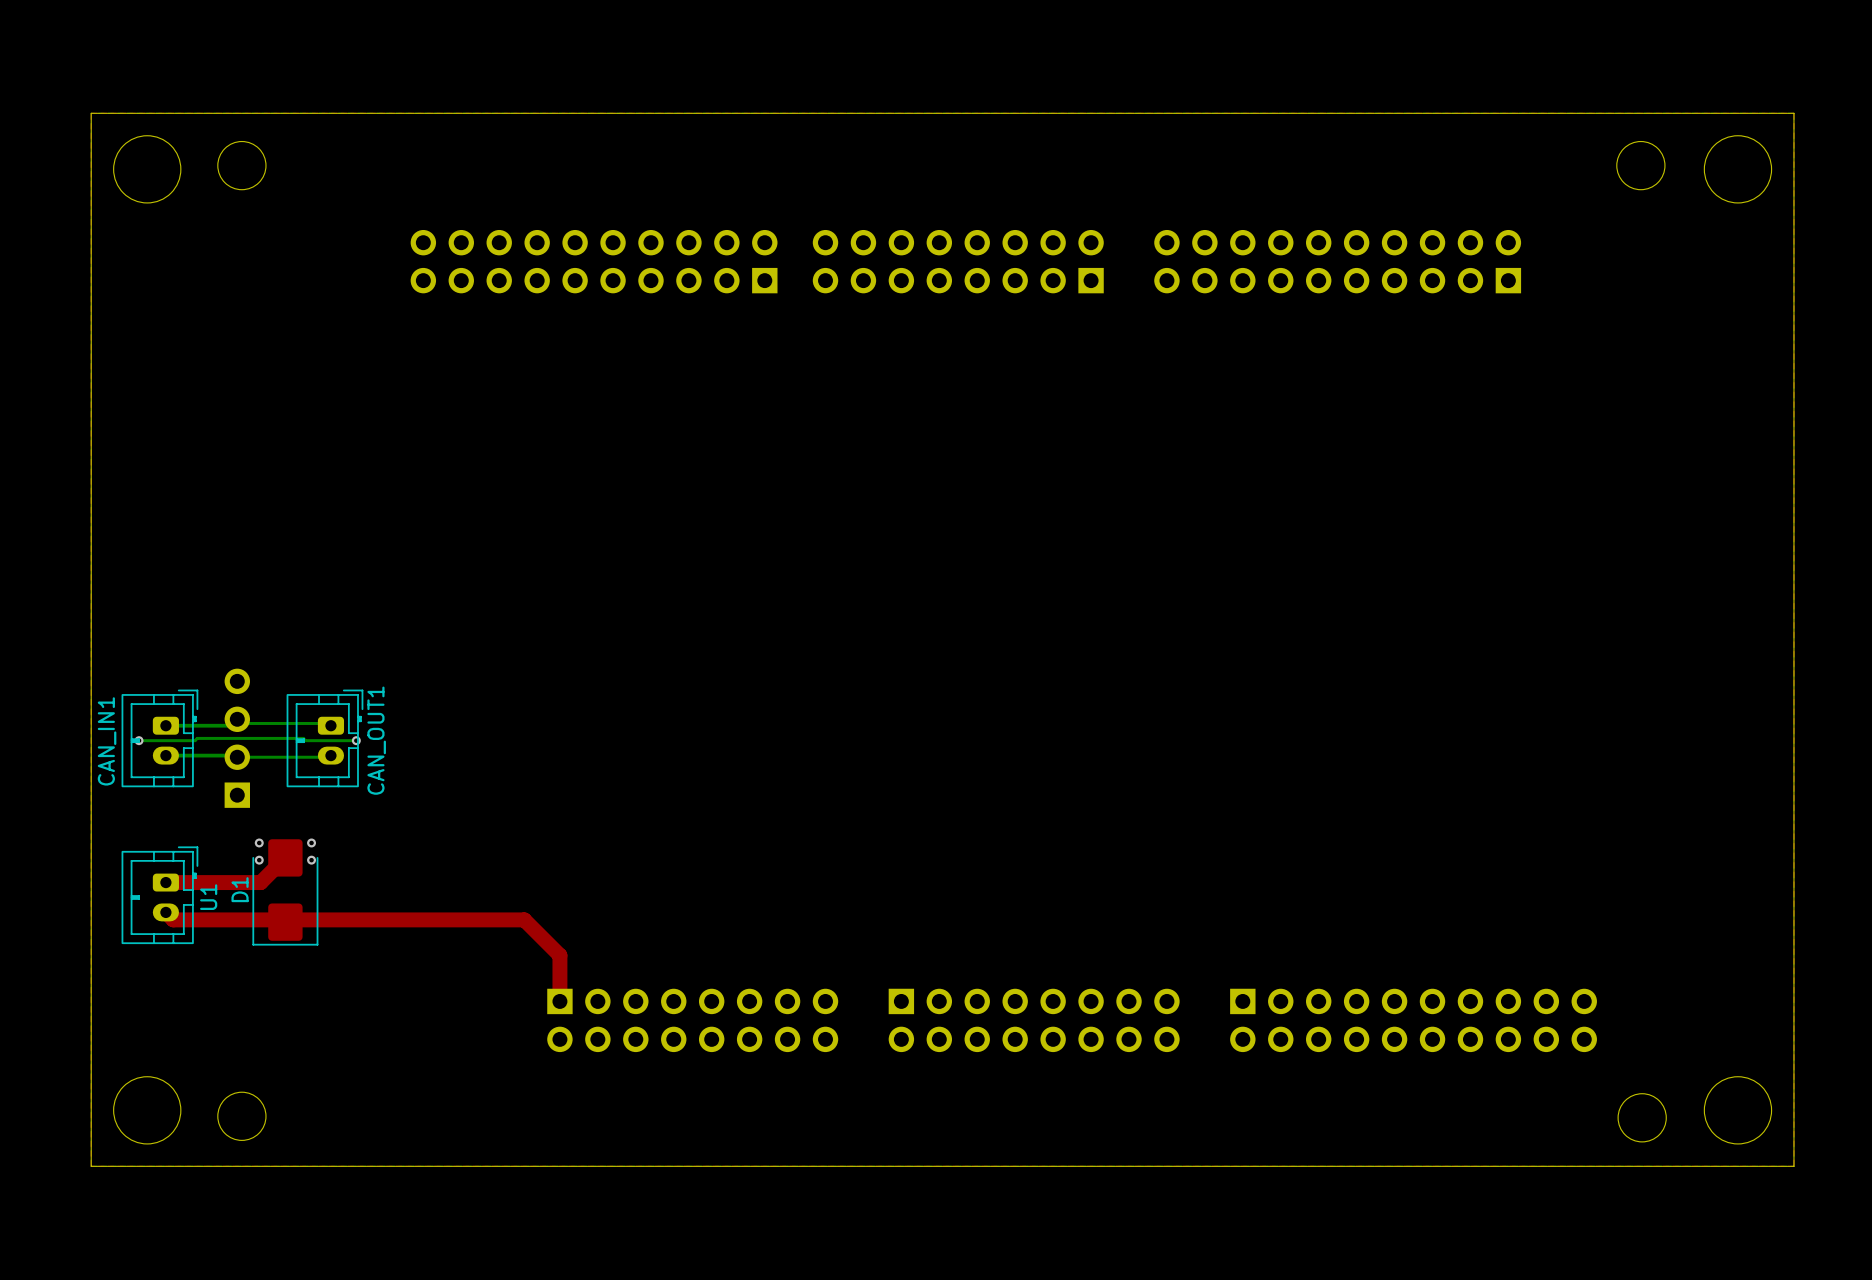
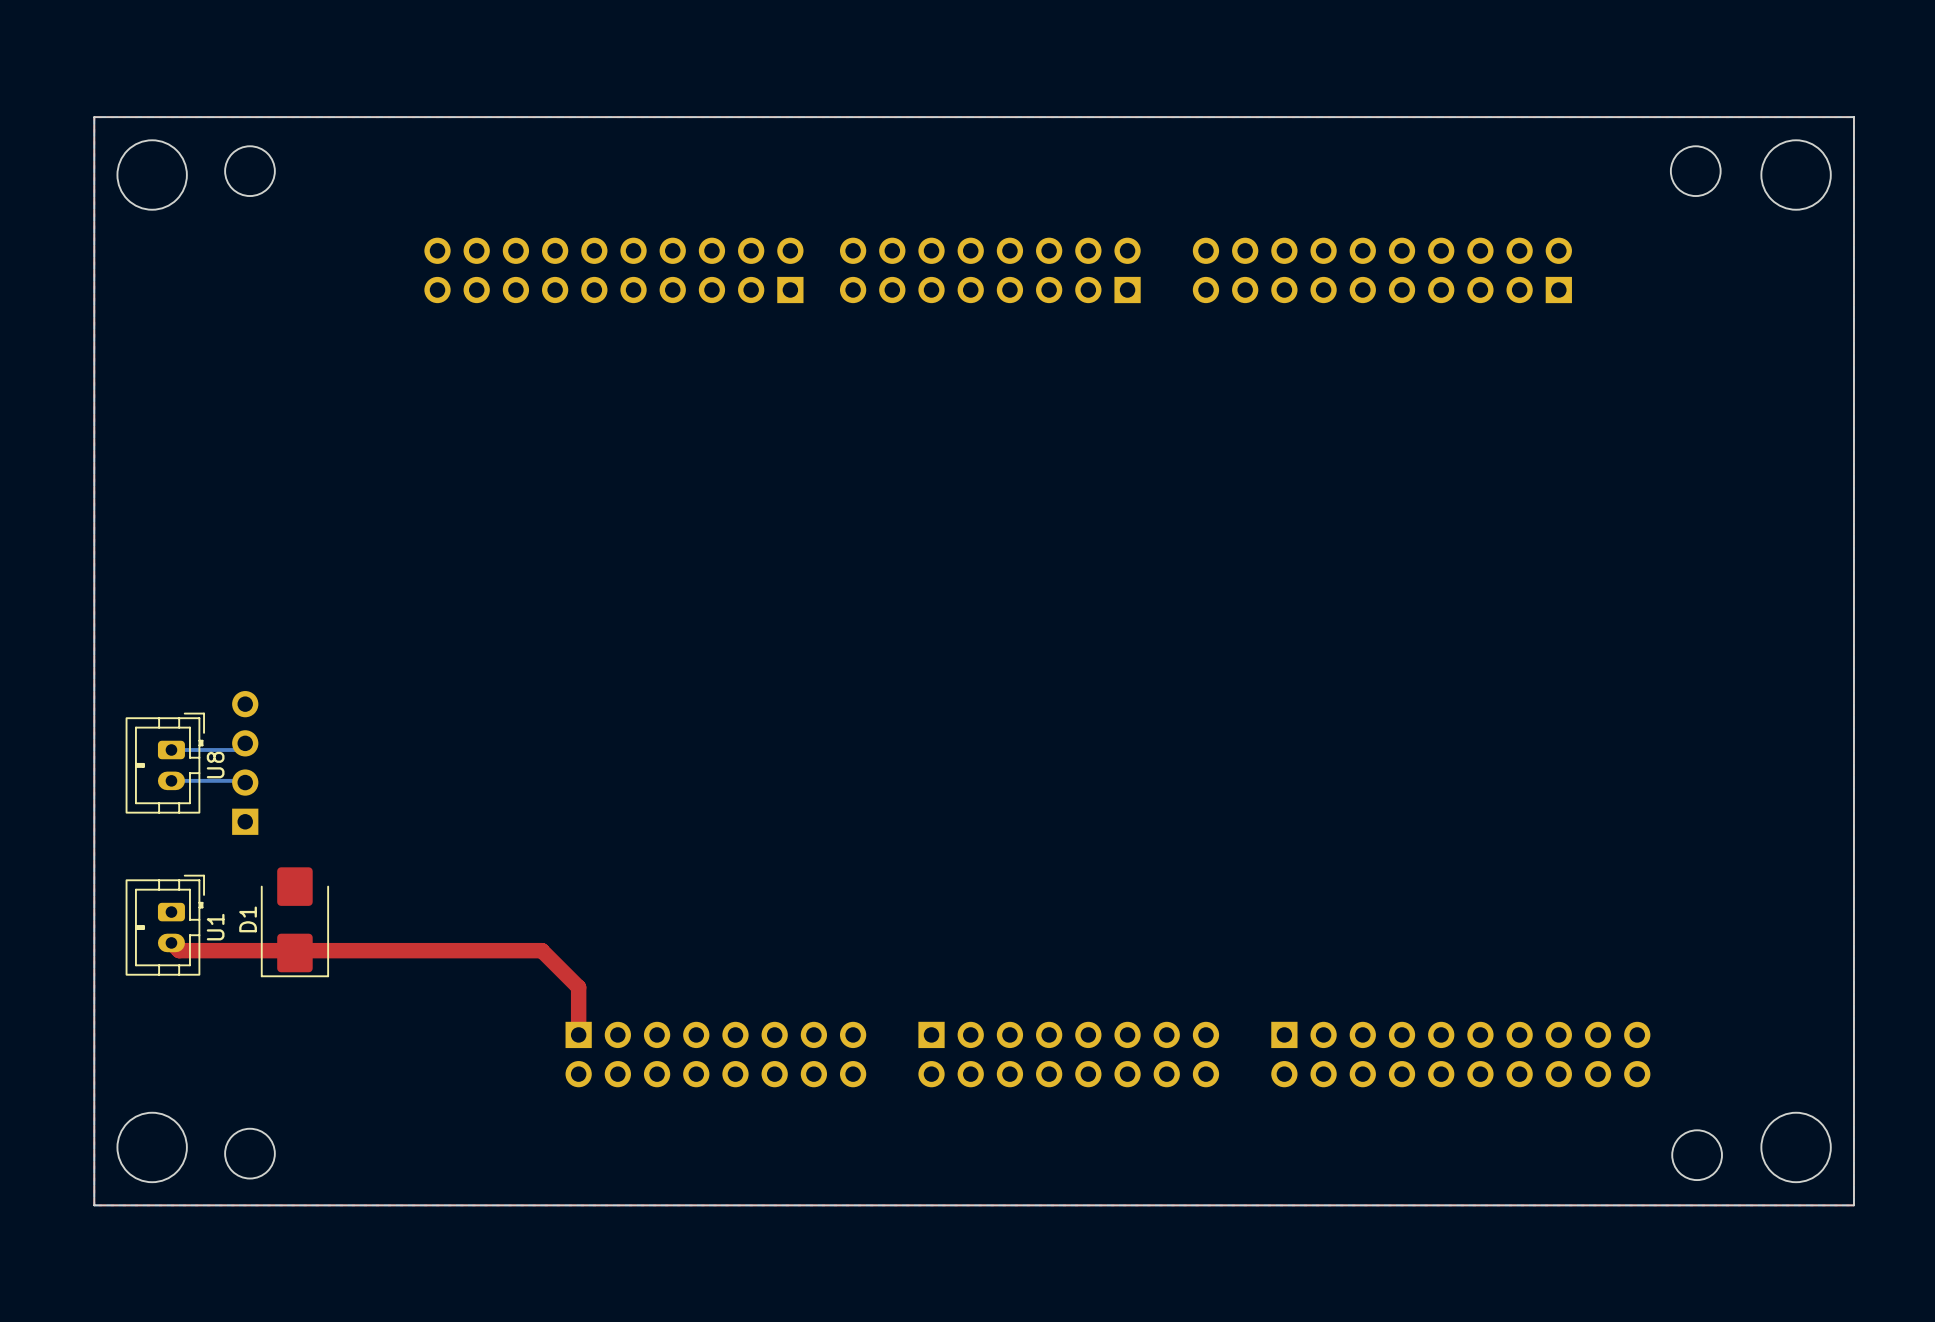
bottom track: (237, 719) (241, 723) (328, 723) (330, 725) -> none
CAN_OUT1: (324, 738) -> none
bottom track: (139, 740) (195, 740) (197, 738) (356, 740) -> none
via: (139, 740) -> none
via: (356, 740) -> none
CAN_IN1 name: CAN_IN1 (107, 741) -> U8 (215, 765)
bottom track: (330, 755) (329, 757) (237, 757) -> none
via: (259, 842) -> none
via: (311, 842) -> none
top track: (285, 857) (260, 882) (165, 882) -> none
via: (259, 860) -> none
via: (311, 860) -> none

